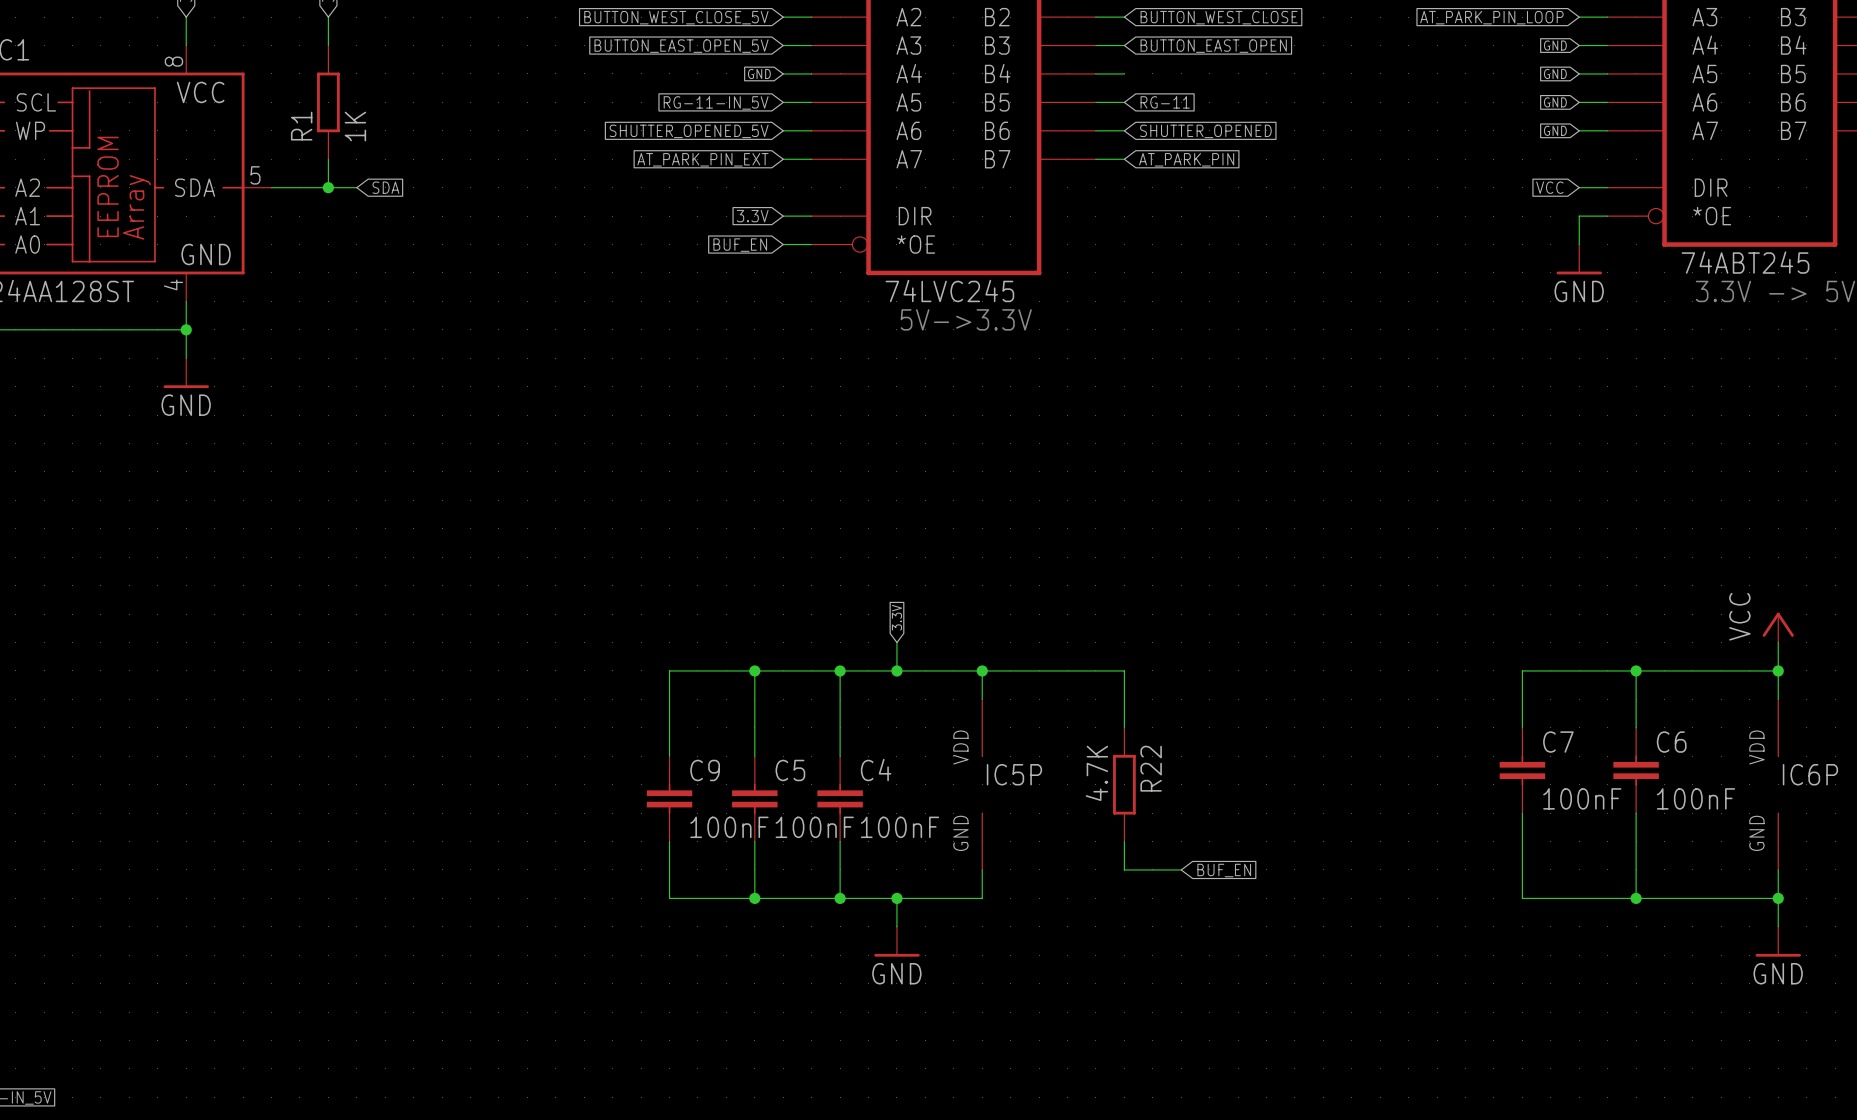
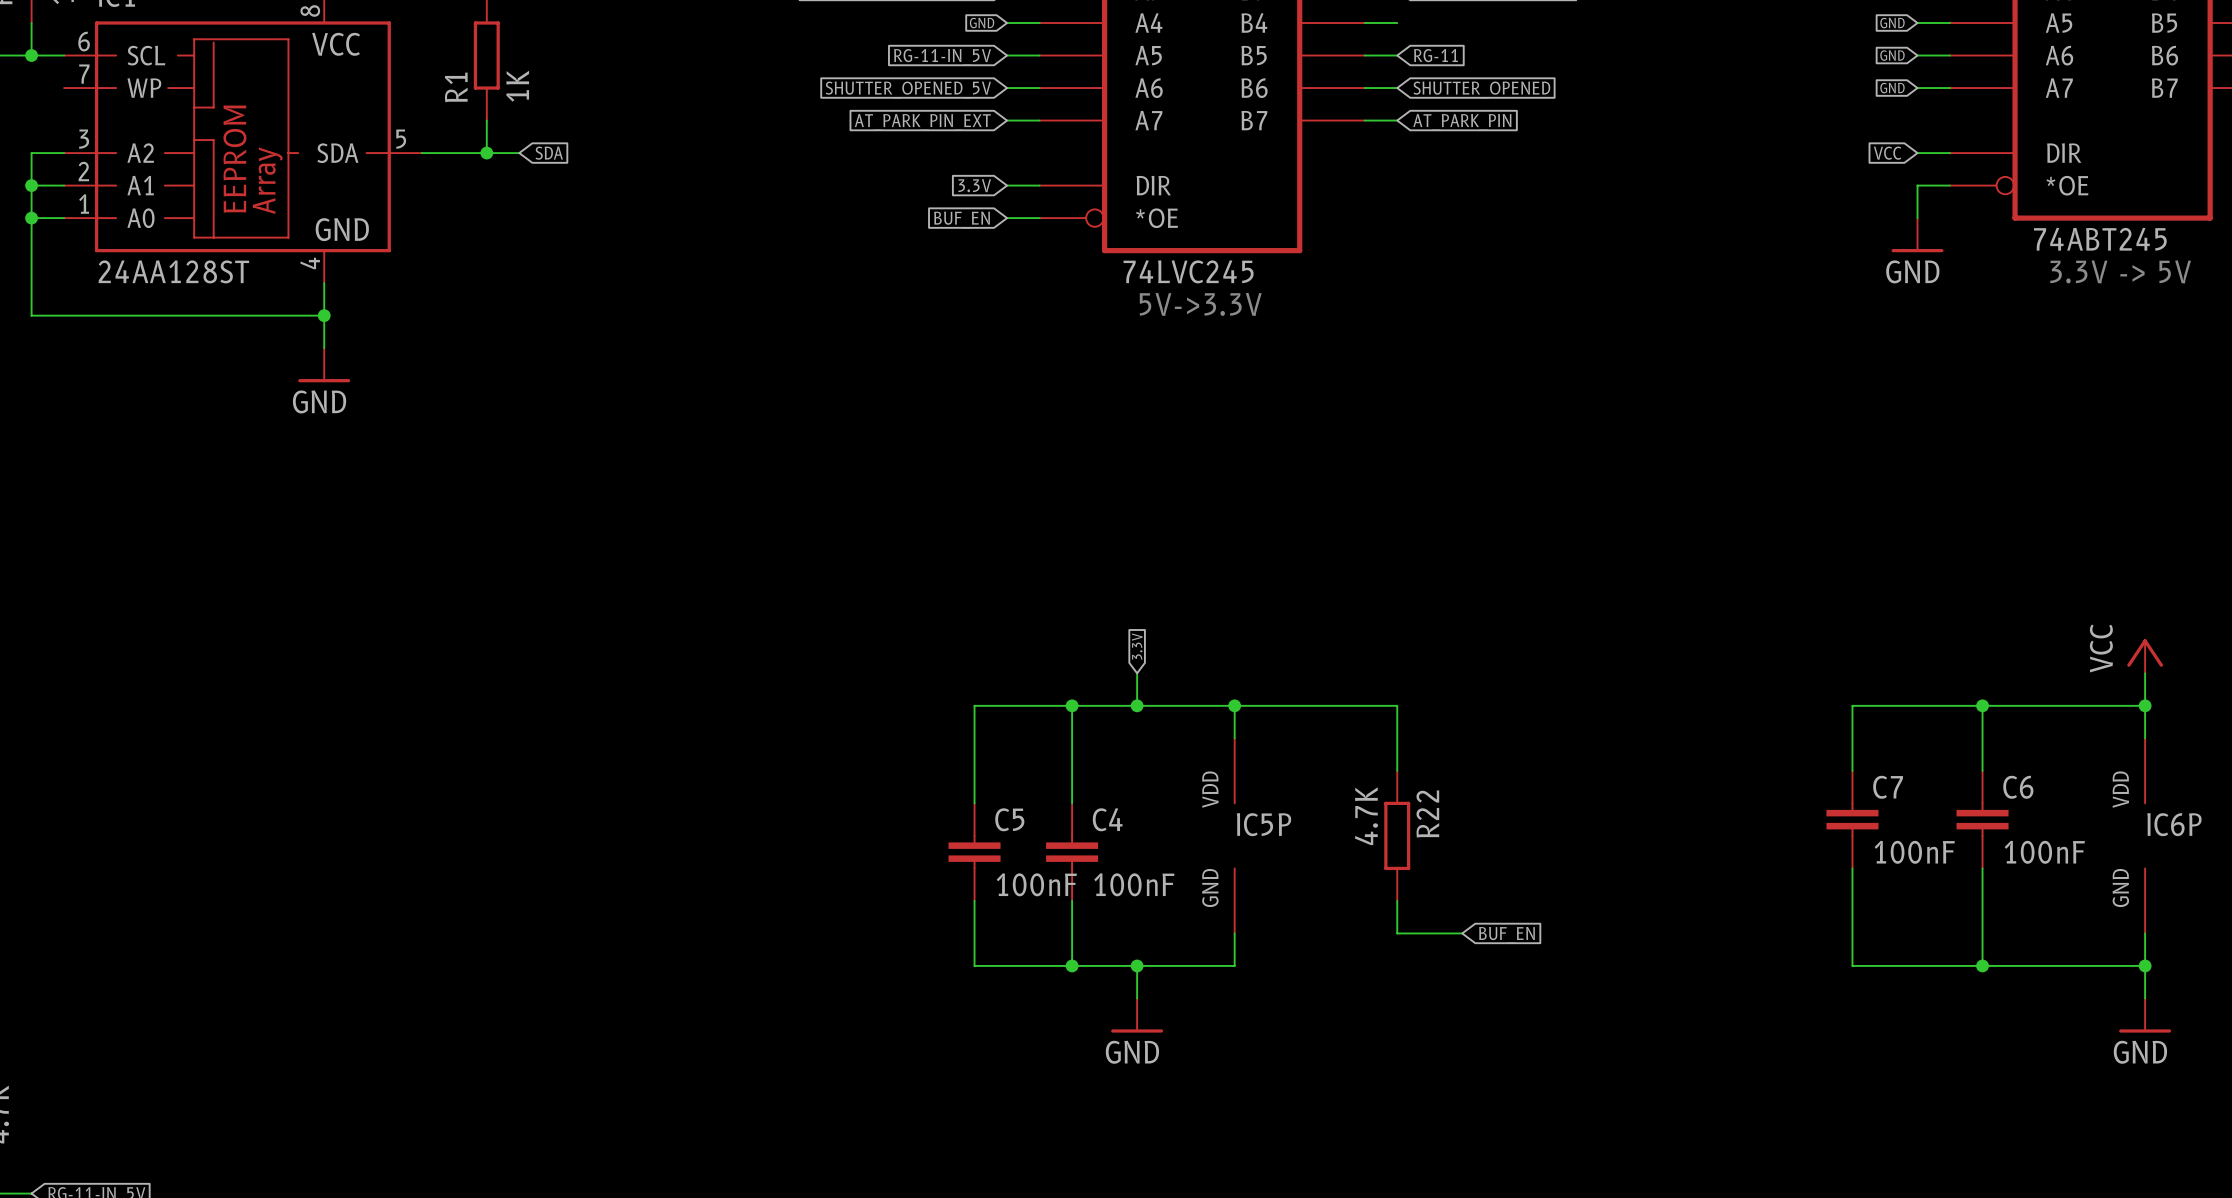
wire: (754, 670) (669, 670) (669, 756) -> none
junction: (754, 670) -> none
C9: 100nF (669, 798) -> none
wire: (669, 841) (669, 898) (754, 898) -> none
junction: (754, 898) -> none

